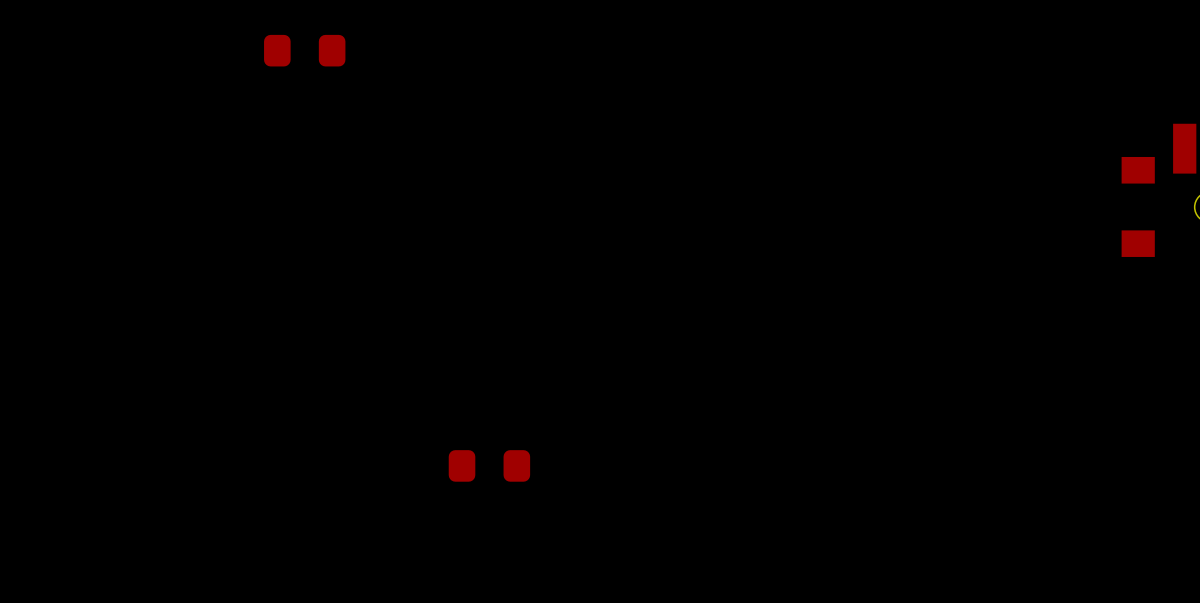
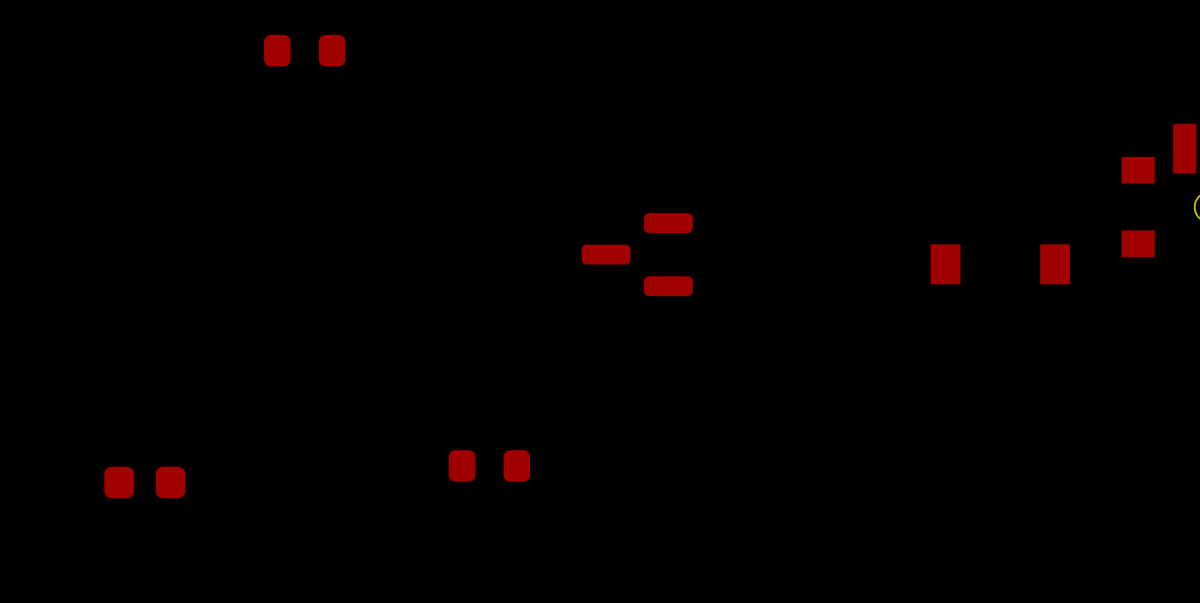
part: none -> (637, 254)
part: none -> (1000, 264)
part: none -> (144, 482)

